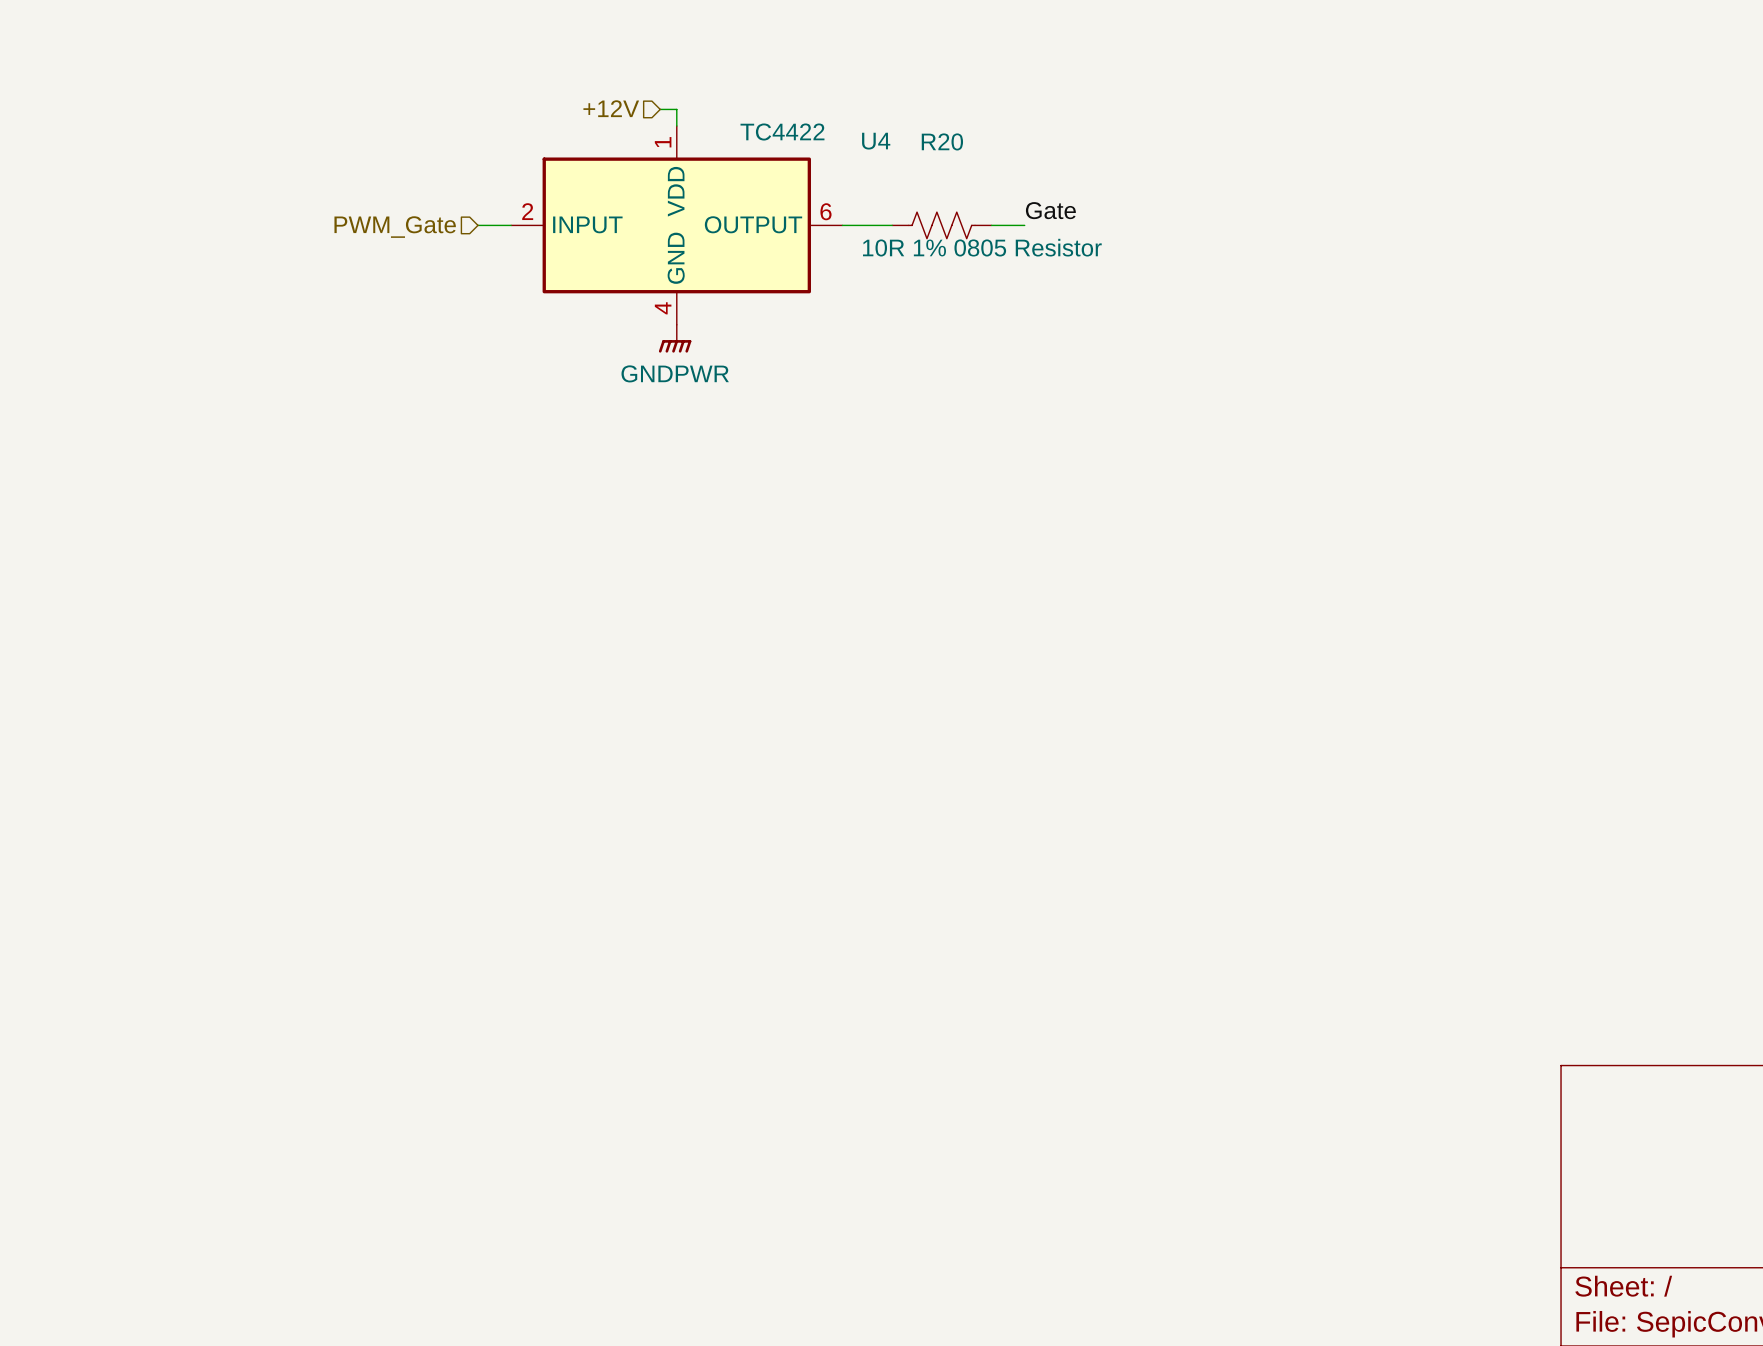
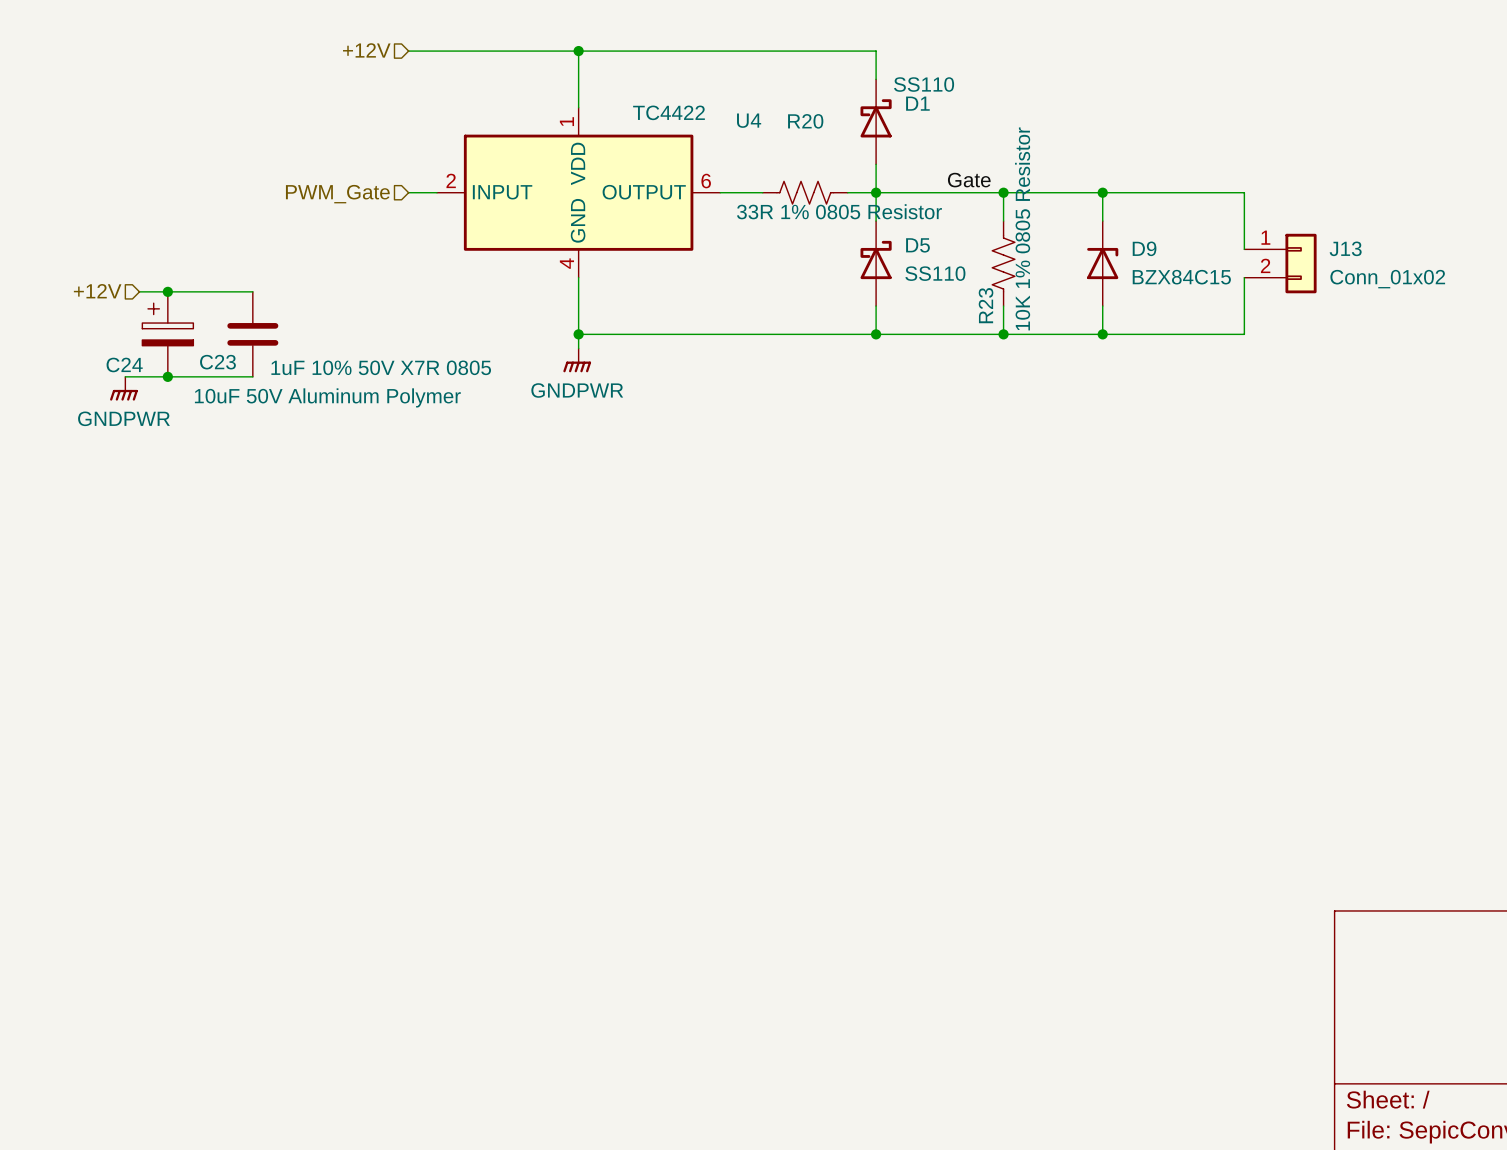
wire: none -> (408, 51) (876, 51) (876, 79)
junction: none -> (578, 51)
hierarchical label position: +12V (611, 108) -> +12V (366, 50)
wire: (660, 109) (676, 109) -> (578, 51) (578, 93)
D1: none -> SS110 (876, 121)
wire: none -> (876, 164) (876, 221)
label position: Gate (1050, 210) -> Gate (969, 180)
wire: none -> (876, 192) (1244, 192) (1244, 249)
junction: none -> (876, 192)
wire: none -> (1003, 192) (1003, 221)
junction: none -> (1003, 192)
wire: none -> (1102, 192) (1102, 221)
junction: none -> (1102, 192)
R20 value: 10R 1% 0805 Resistor (982, 247) -> 33R 1% 0805 Resistor (839, 211)
D5: none -> SS110 (876, 263)
R23: none -> 10K 1% 0805 Resistor (1003, 263)
D9: none -> BZX84C15 (1102, 263)
J13: none -> Conn_01x02 (1280, 263)
wire: none -> (578, 277) (578, 348)
wire: none -> (1244, 277) (1244, 334) (578, 334)
power symbol position: GNDPWR (675, 338) -> GNDPWR (577, 360)
hierarchical label: none -> +12V (97, 291)
wire: none -> (139, 291) (252, 291)
junction: none -> (167, 291)
wire: none -> (876, 306) (876, 334)
wire: none -> (1003, 306) (1003, 334)
wire: none -> (1102, 306) (1102, 334)
C24: none -> 10uF 50V Aluminum Polymer (167, 334)
C23: none -> 1uF 10% 50V X7R 0805 (252, 334)
junction: none -> (578, 334)
junction: none -> (876, 334)
junction: none -> (1003, 334)
junction: none -> (1102, 334)
wire: none -> (125, 376) (252, 376)
junction: none -> (167, 376)
power symbol: none -> GNDPWR (123, 388)

